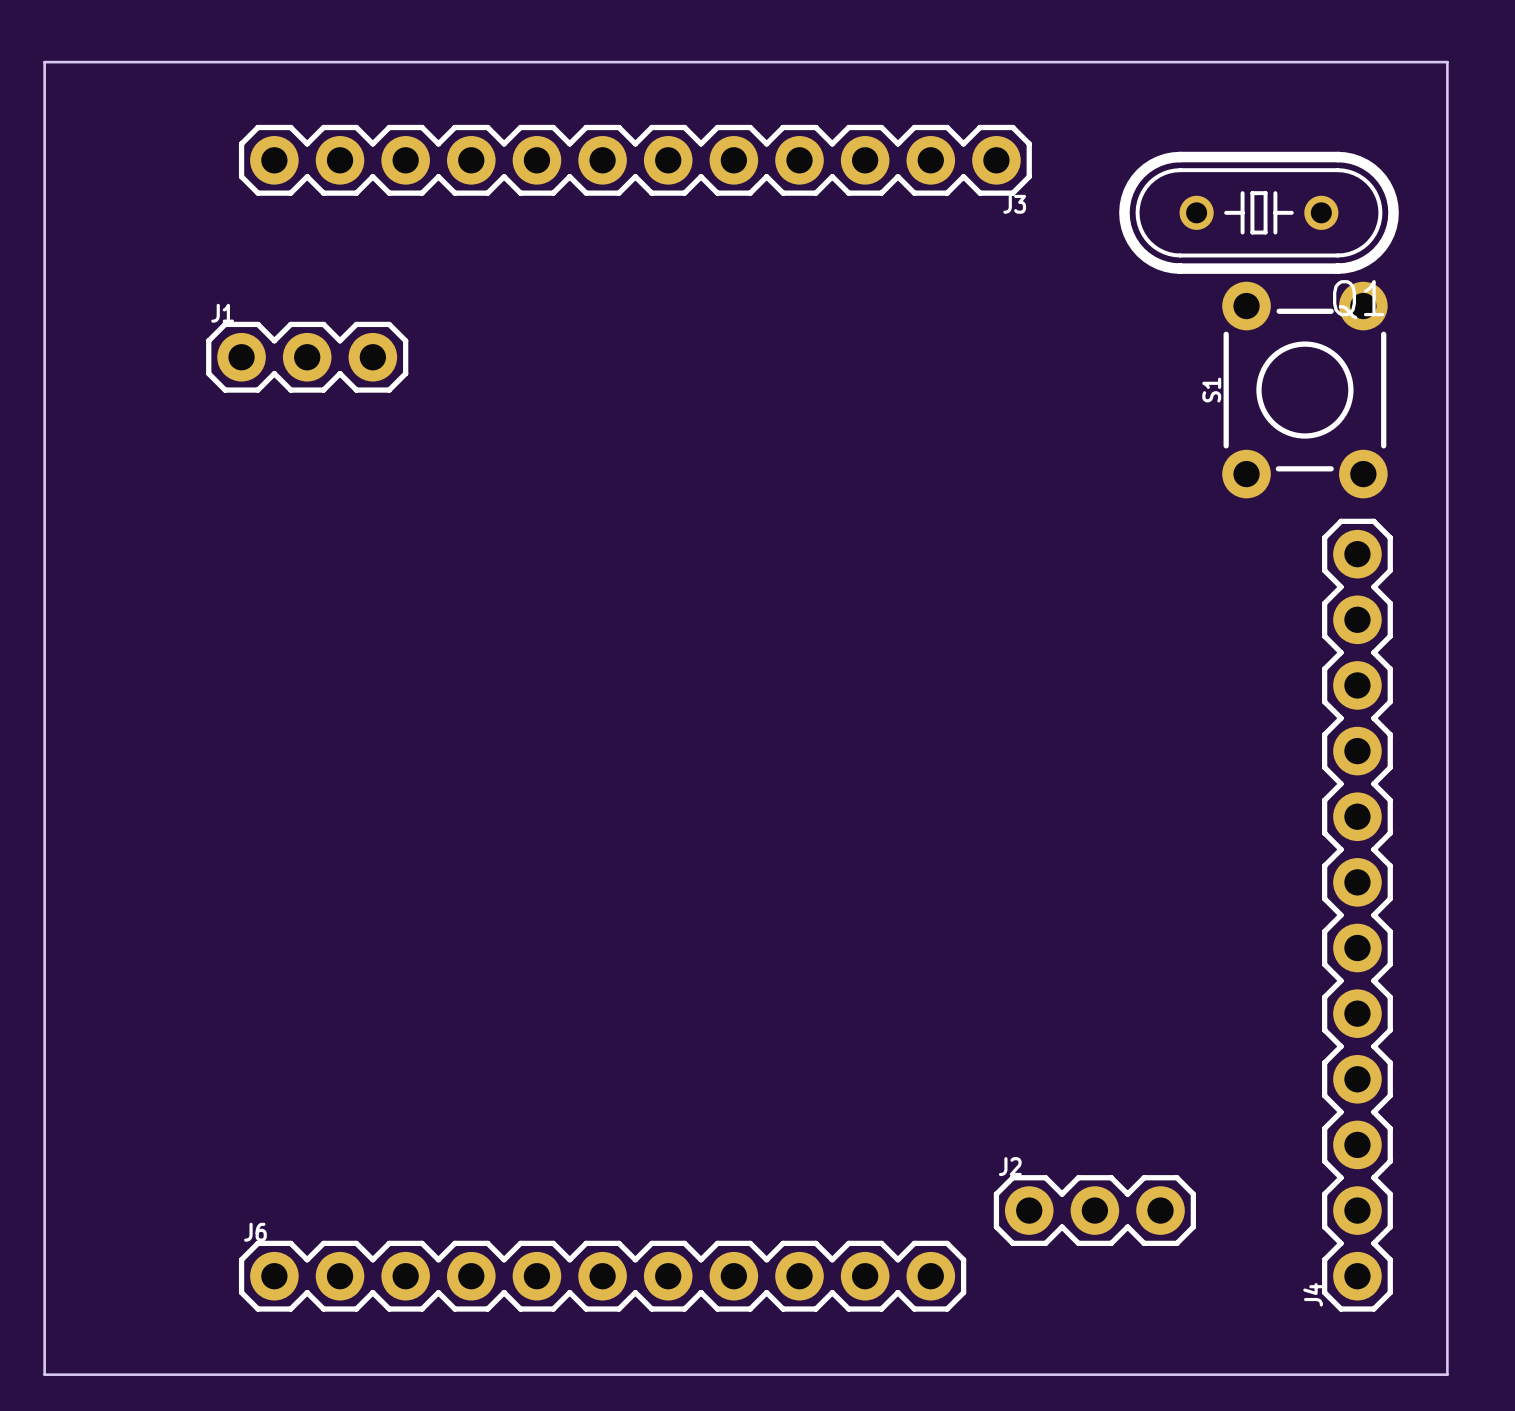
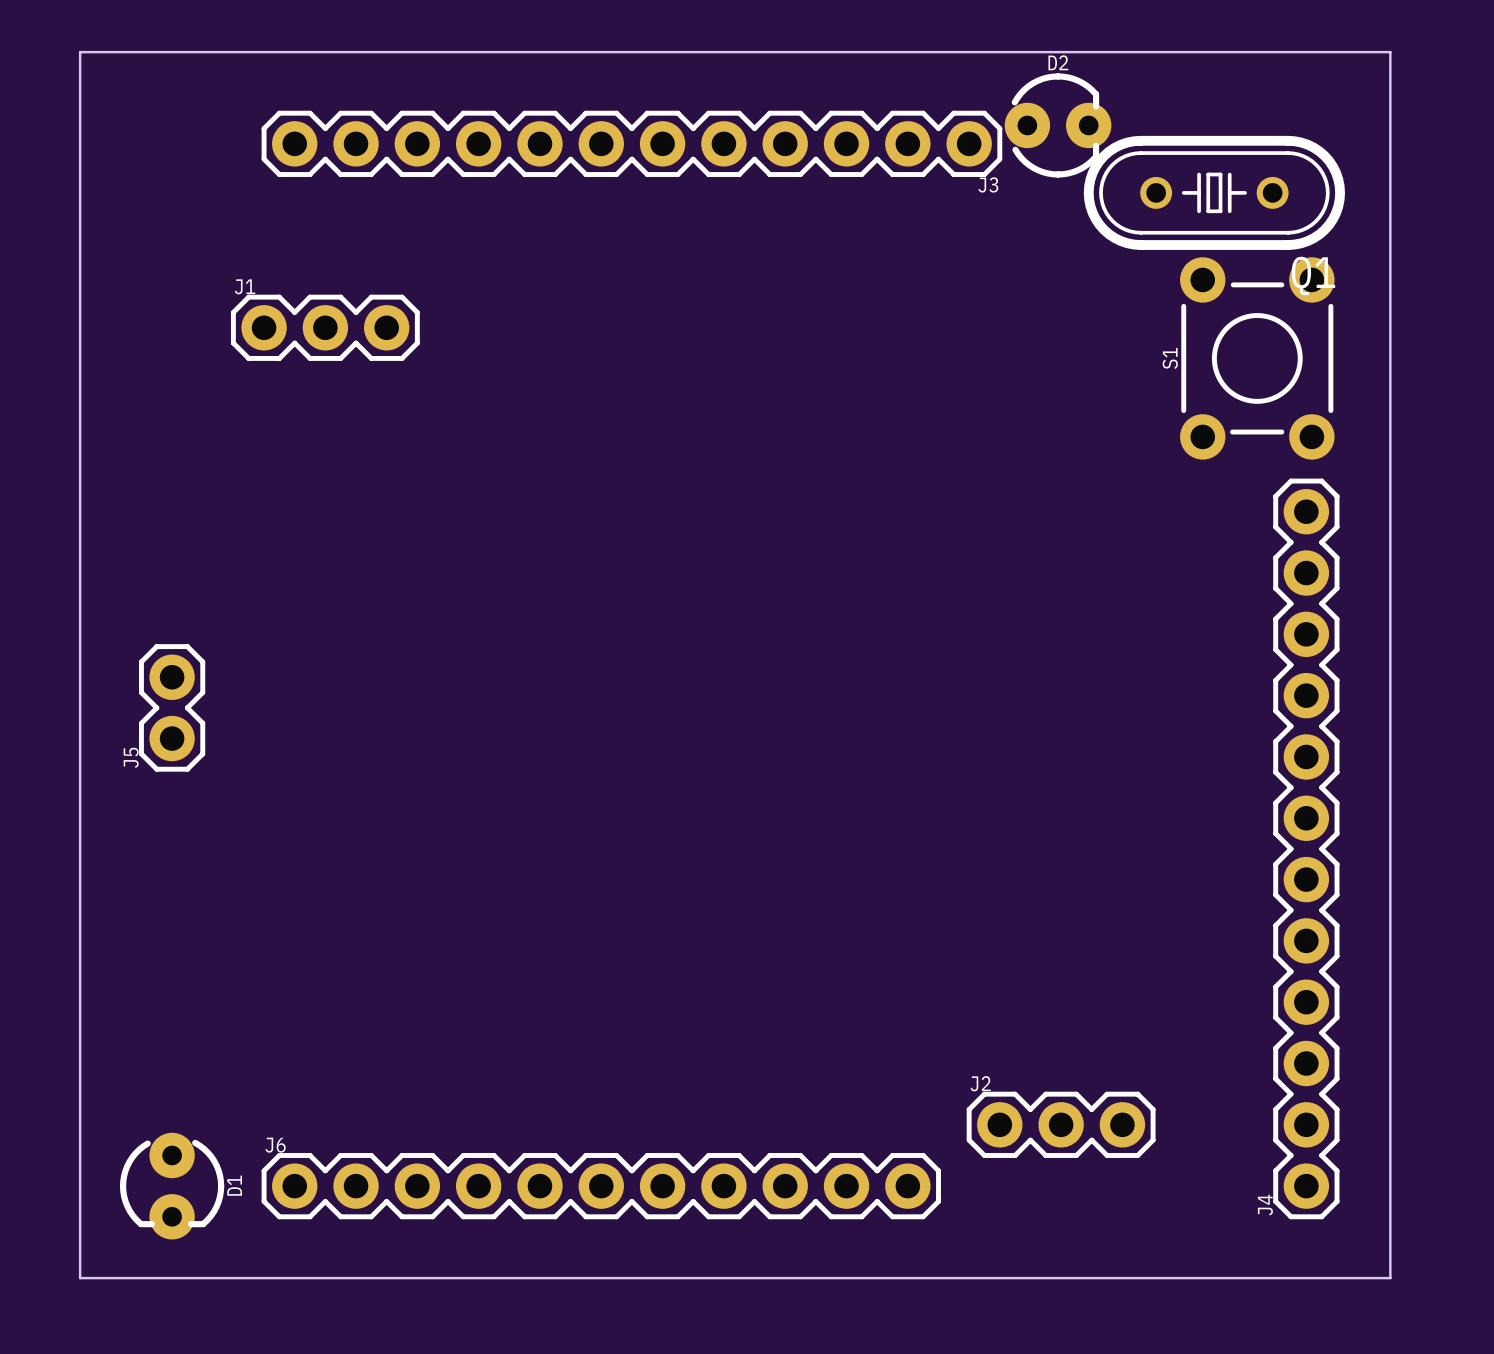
D2: none -> (1058, 125)
J5: none -> (172, 707)
D1: none -> (172, 1186)

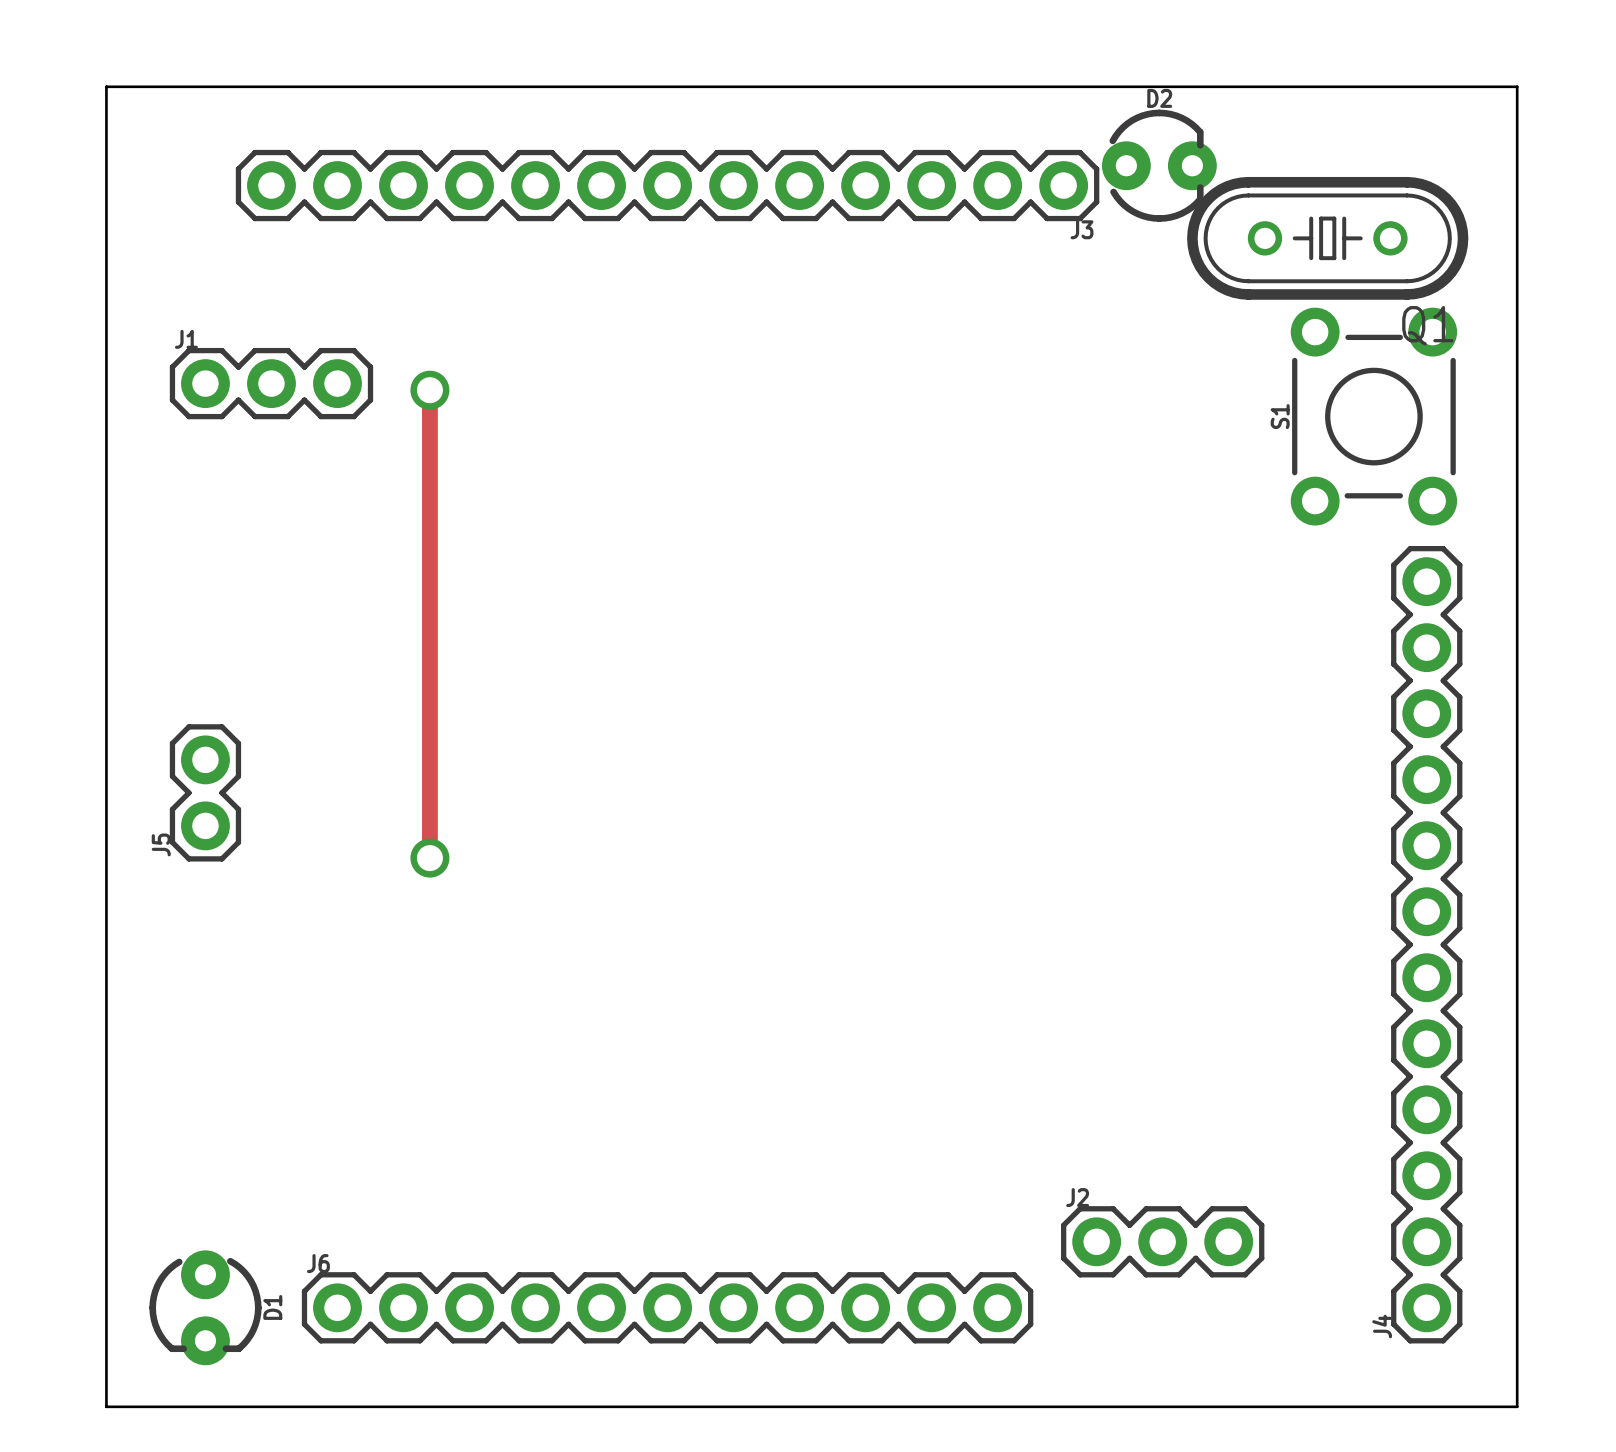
J3 footprint: [261, 110, 1003, 177] -> [235, 149, 1100, 222]
J1 position: (325, 327) -> (271, 383)
track: none -> (429, 390) (429, 858)
via: none -> (429, 390)
via: none -> (429, 858)

